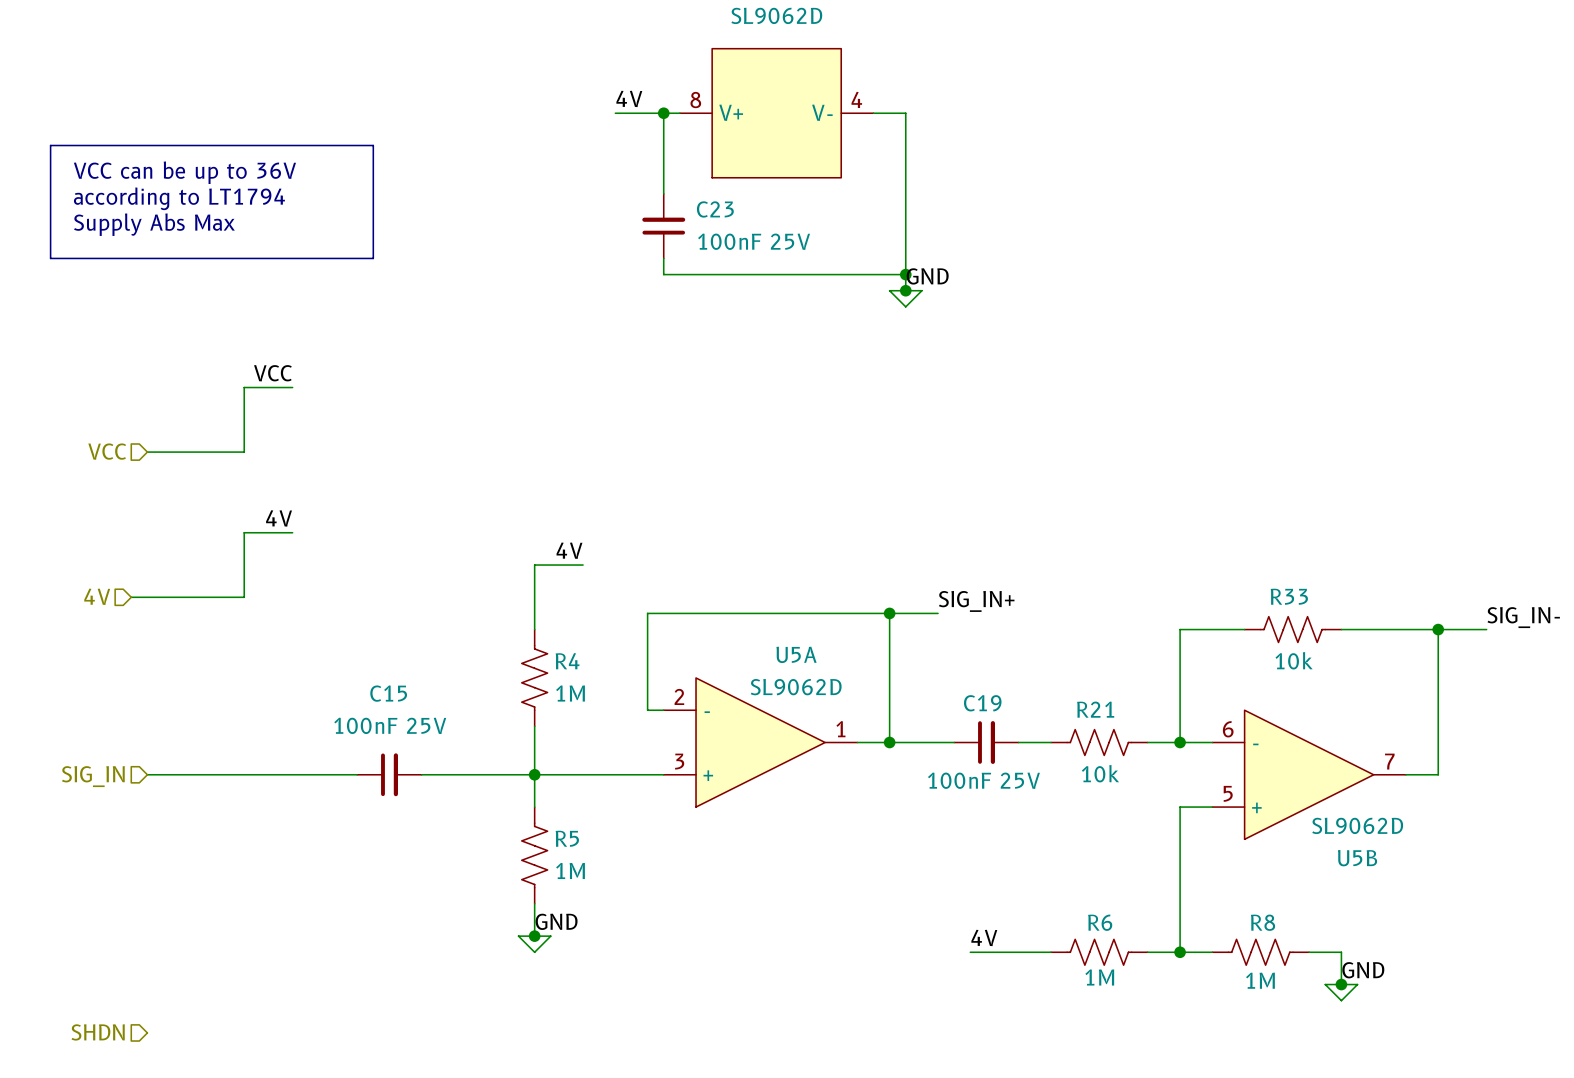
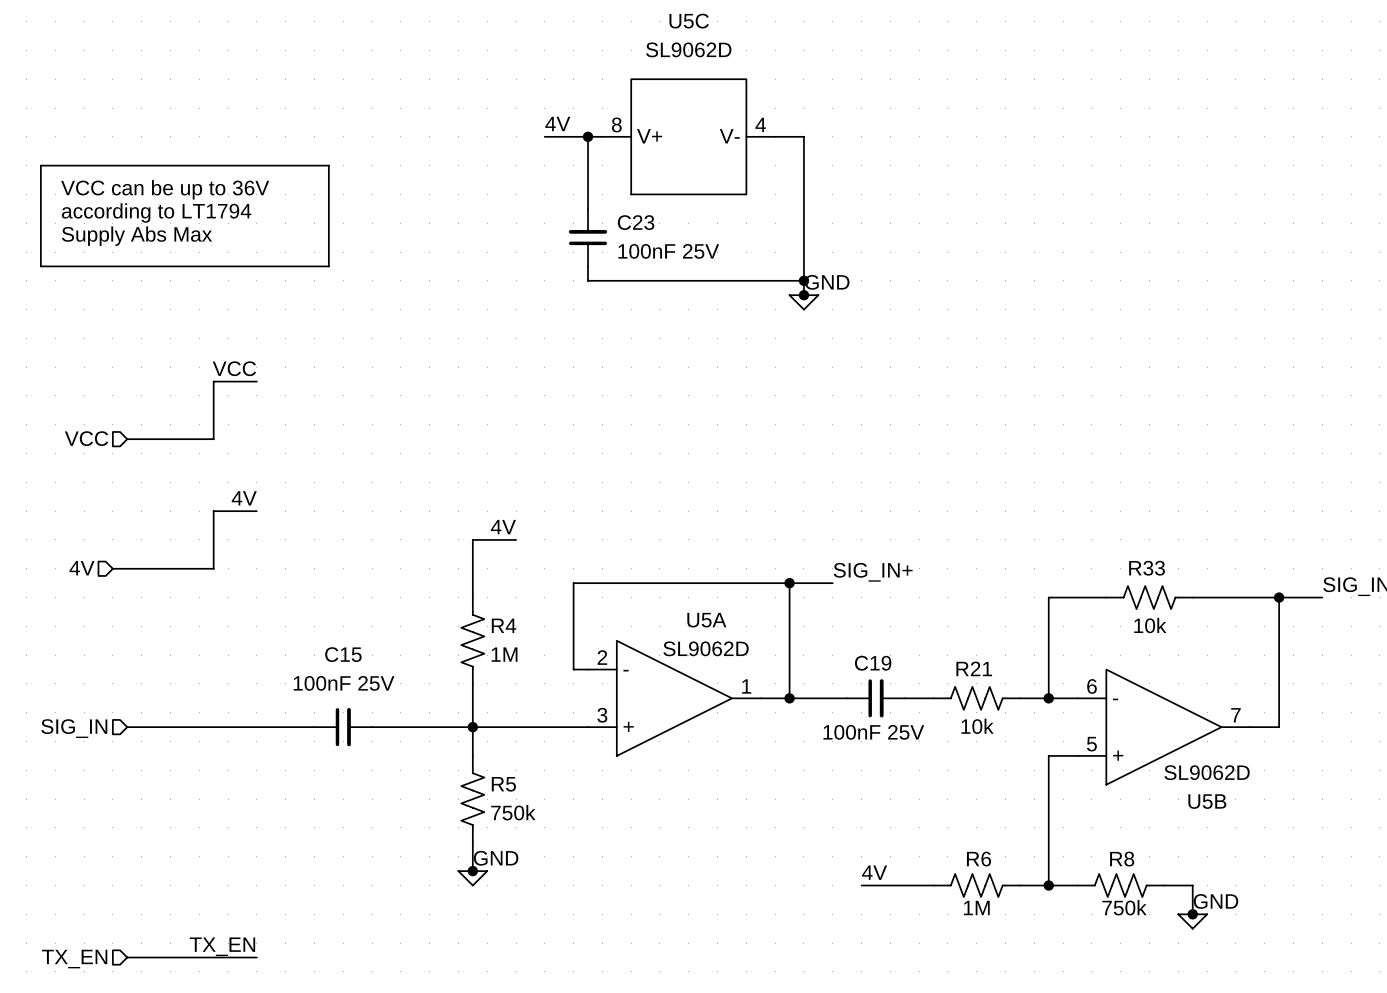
R5 value: 1M (570, 870) -> 750k (513, 812)
R8 value: 1M (1260, 980) -> 750k (1124, 907)
label: none -> TX_EN (222, 946)
hierarchical label: SHDN (98, 1032) -> TX_EN (74, 959)
wire: none -> (127, 957) (256, 957)

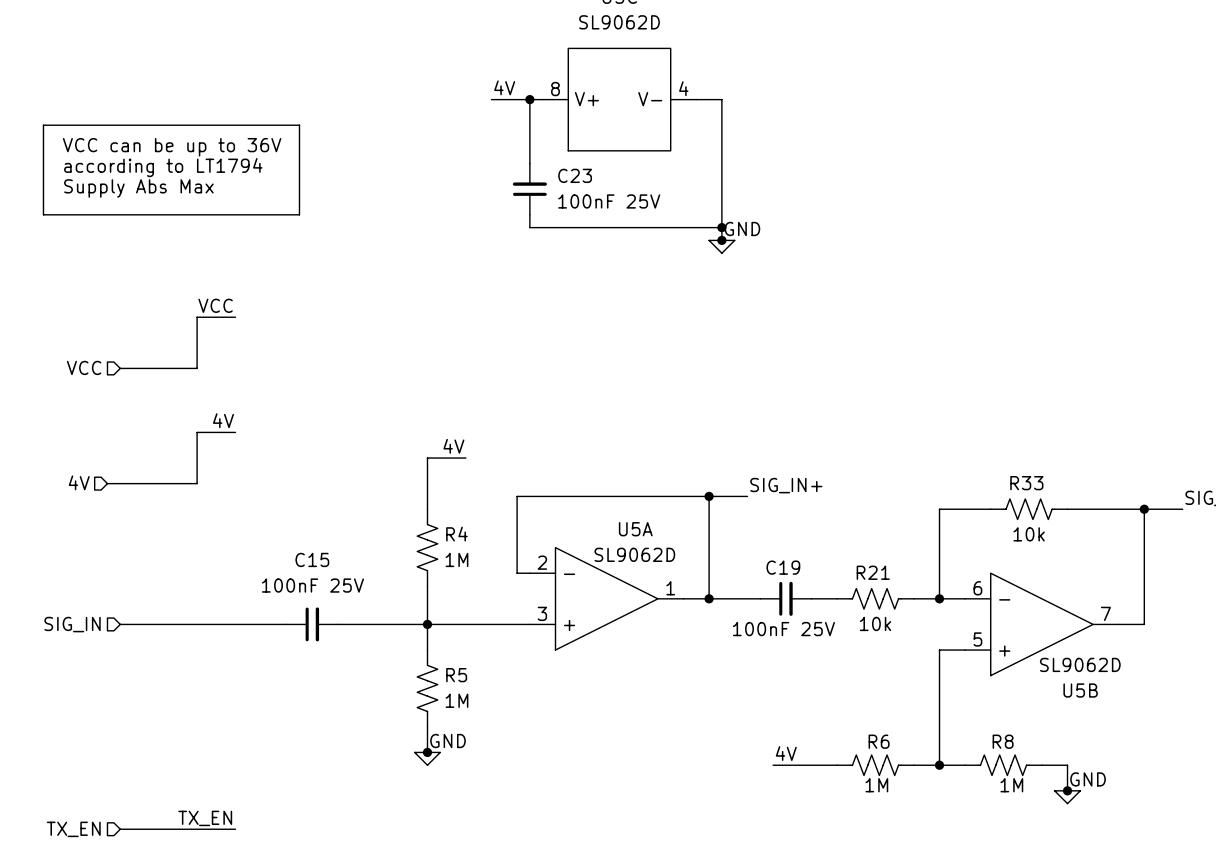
R5 value: 750k (513, 812) -> 1M (456, 700)
R8 value: 750k (1124, 907) -> 1M (1011, 785)

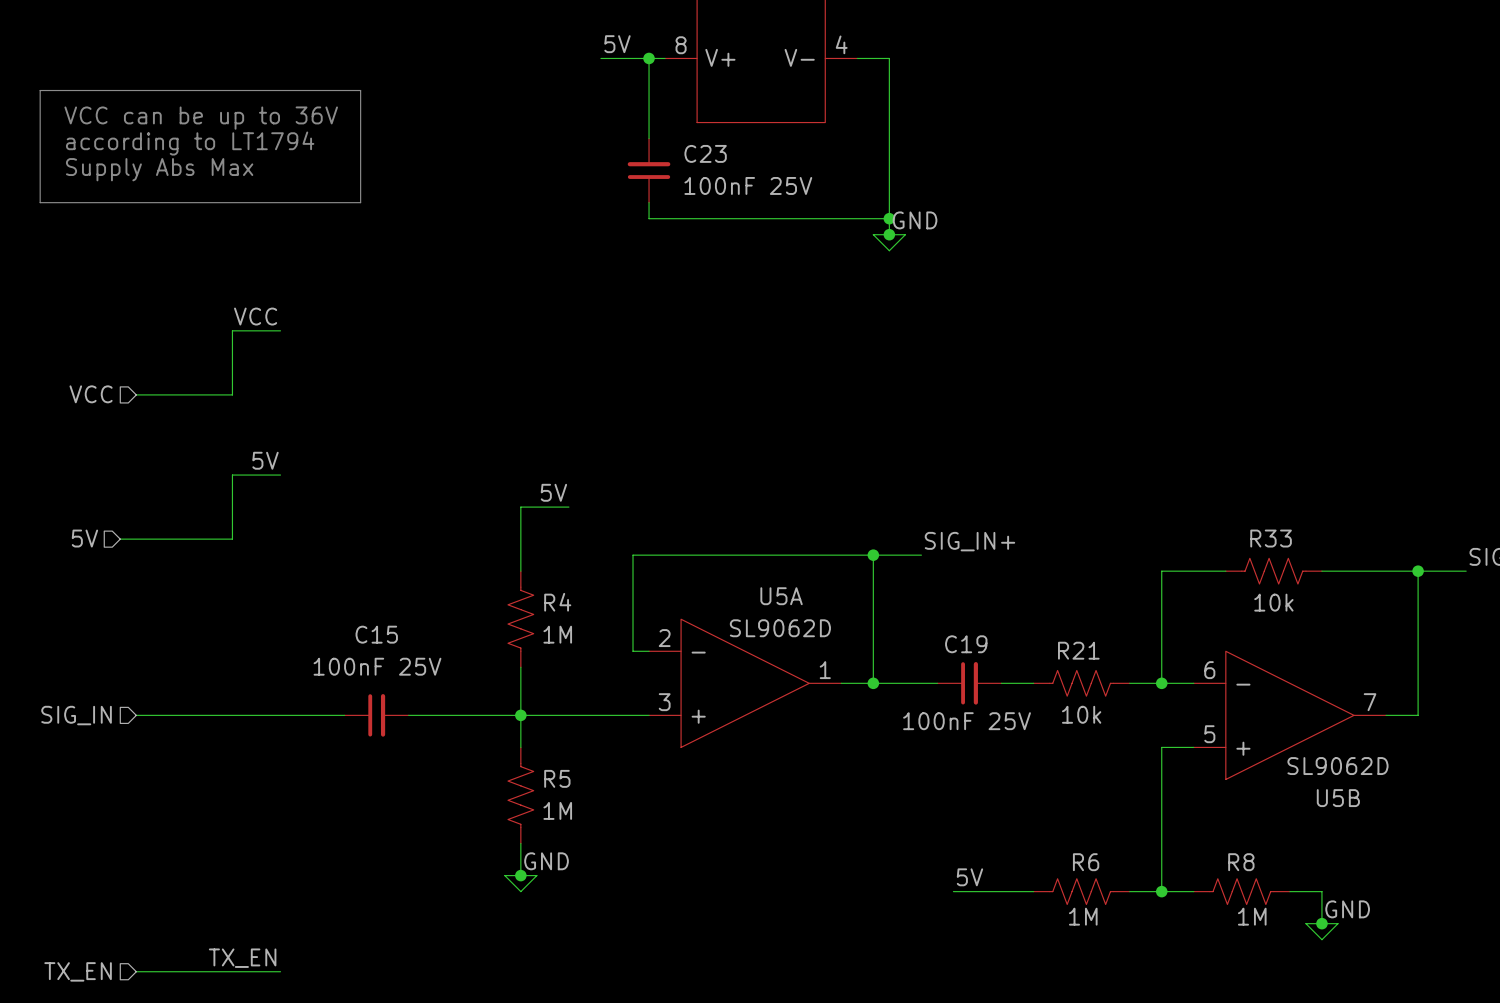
label: 4V (504, 87) -> 5V (617, 44)
label: 4V (223, 420) -> 5V (265, 460)
label: 4V (453, 446) -> 5V (553, 492)
hierarchical label: 4V (79, 482) -> 5V (84, 538)
label: 4V (786, 753) -> 5V (969, 877)

